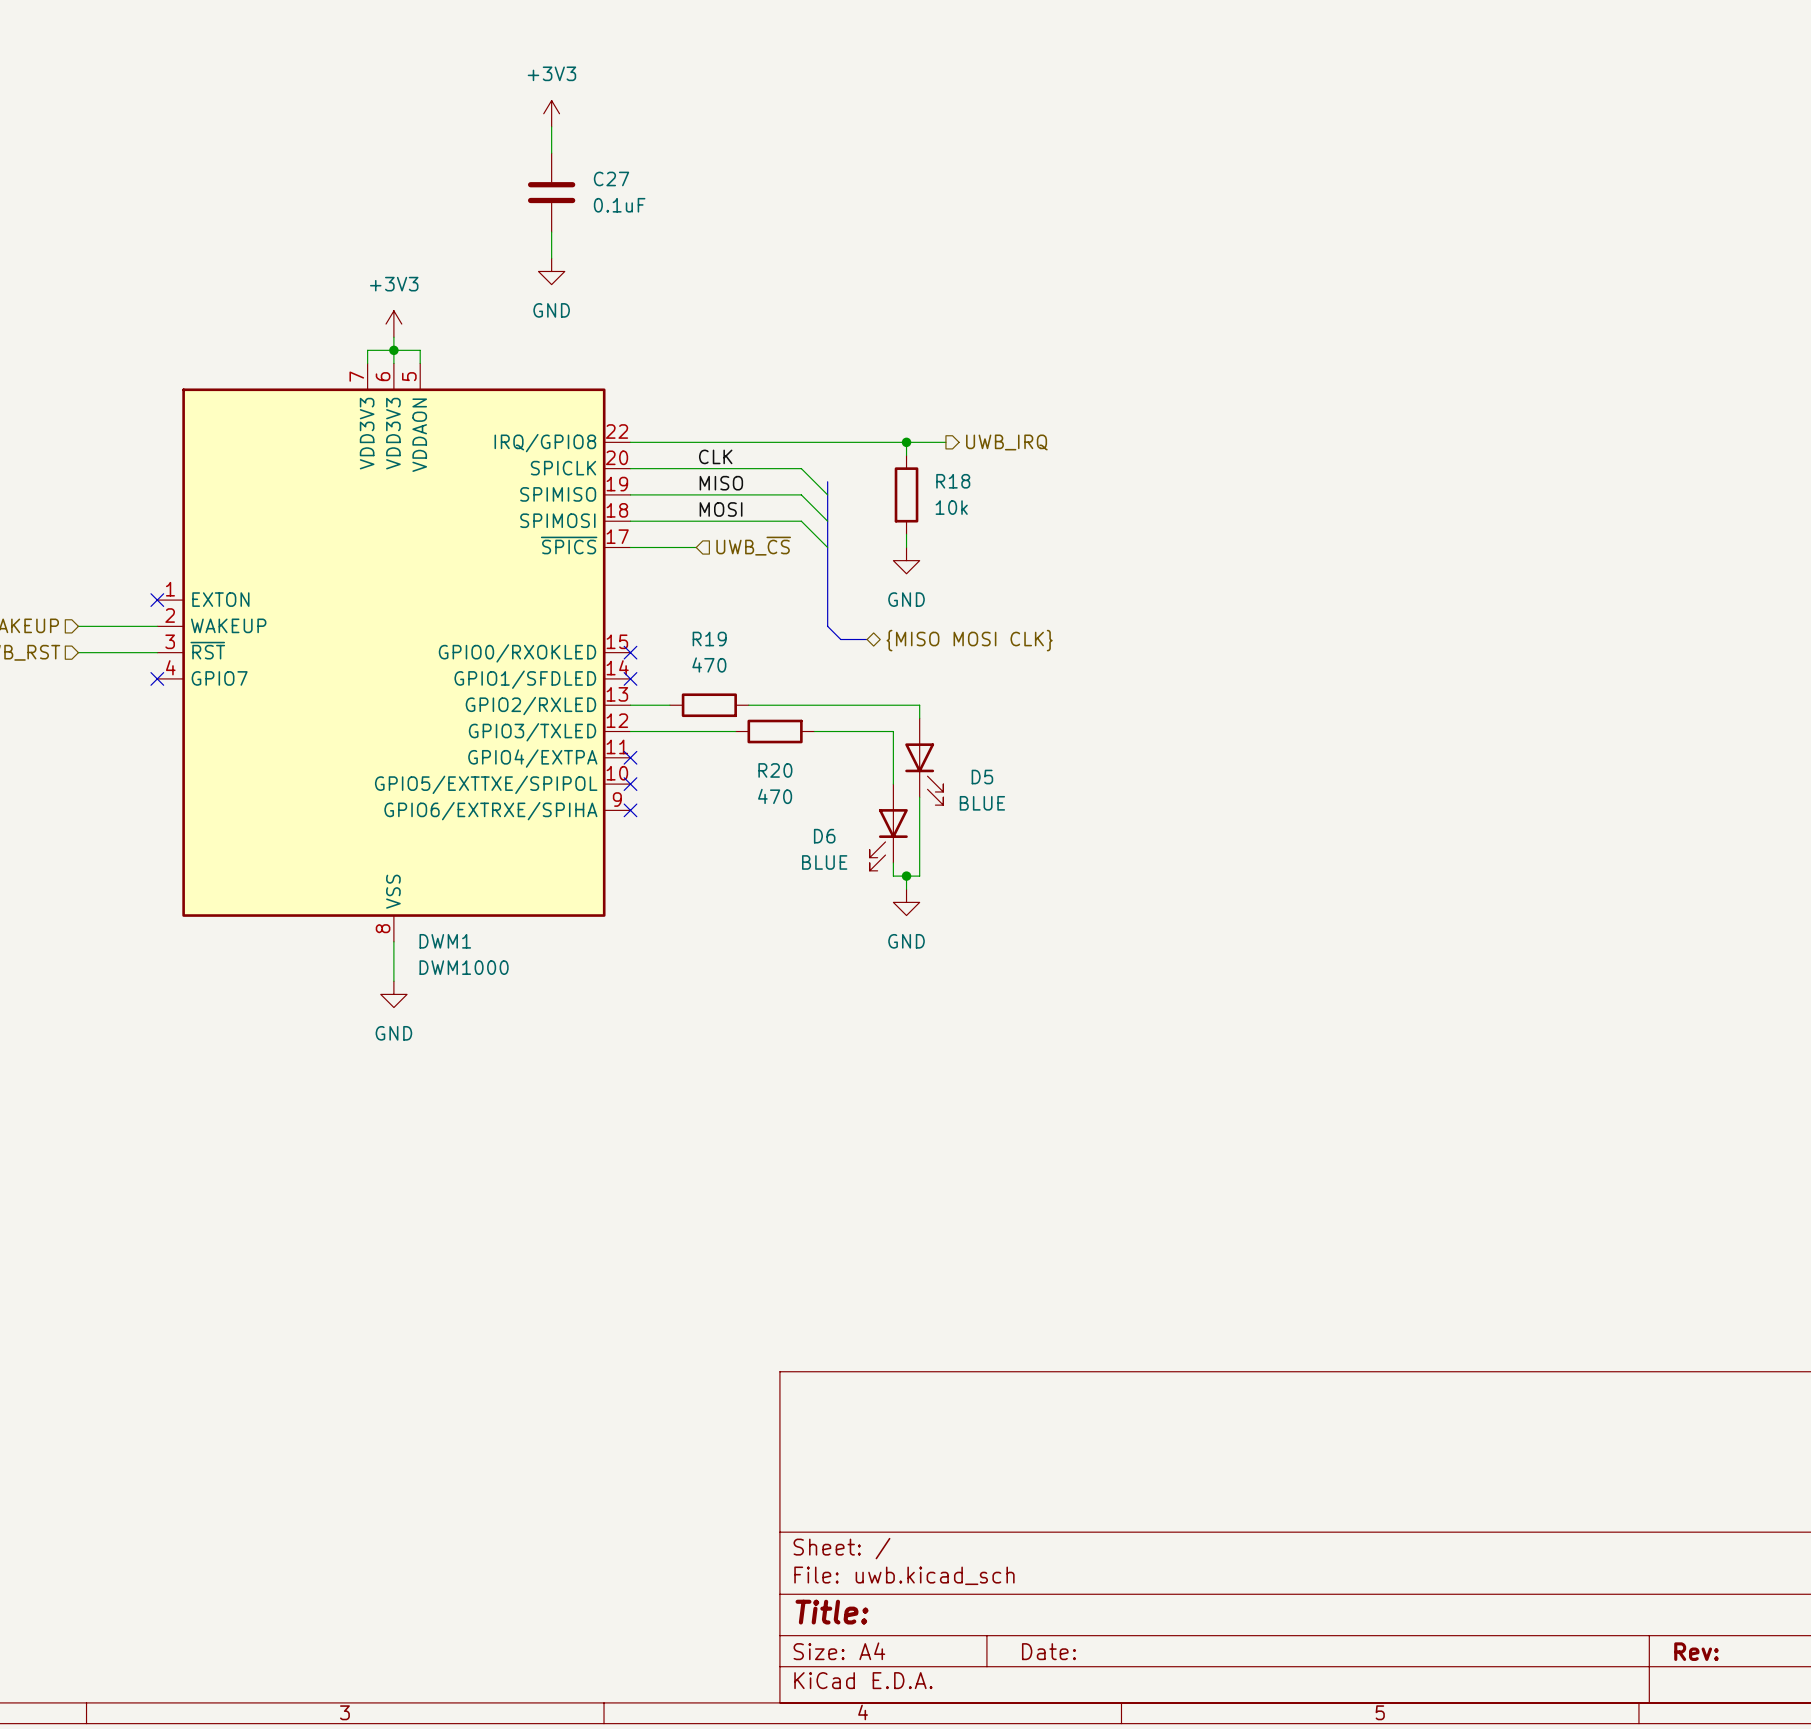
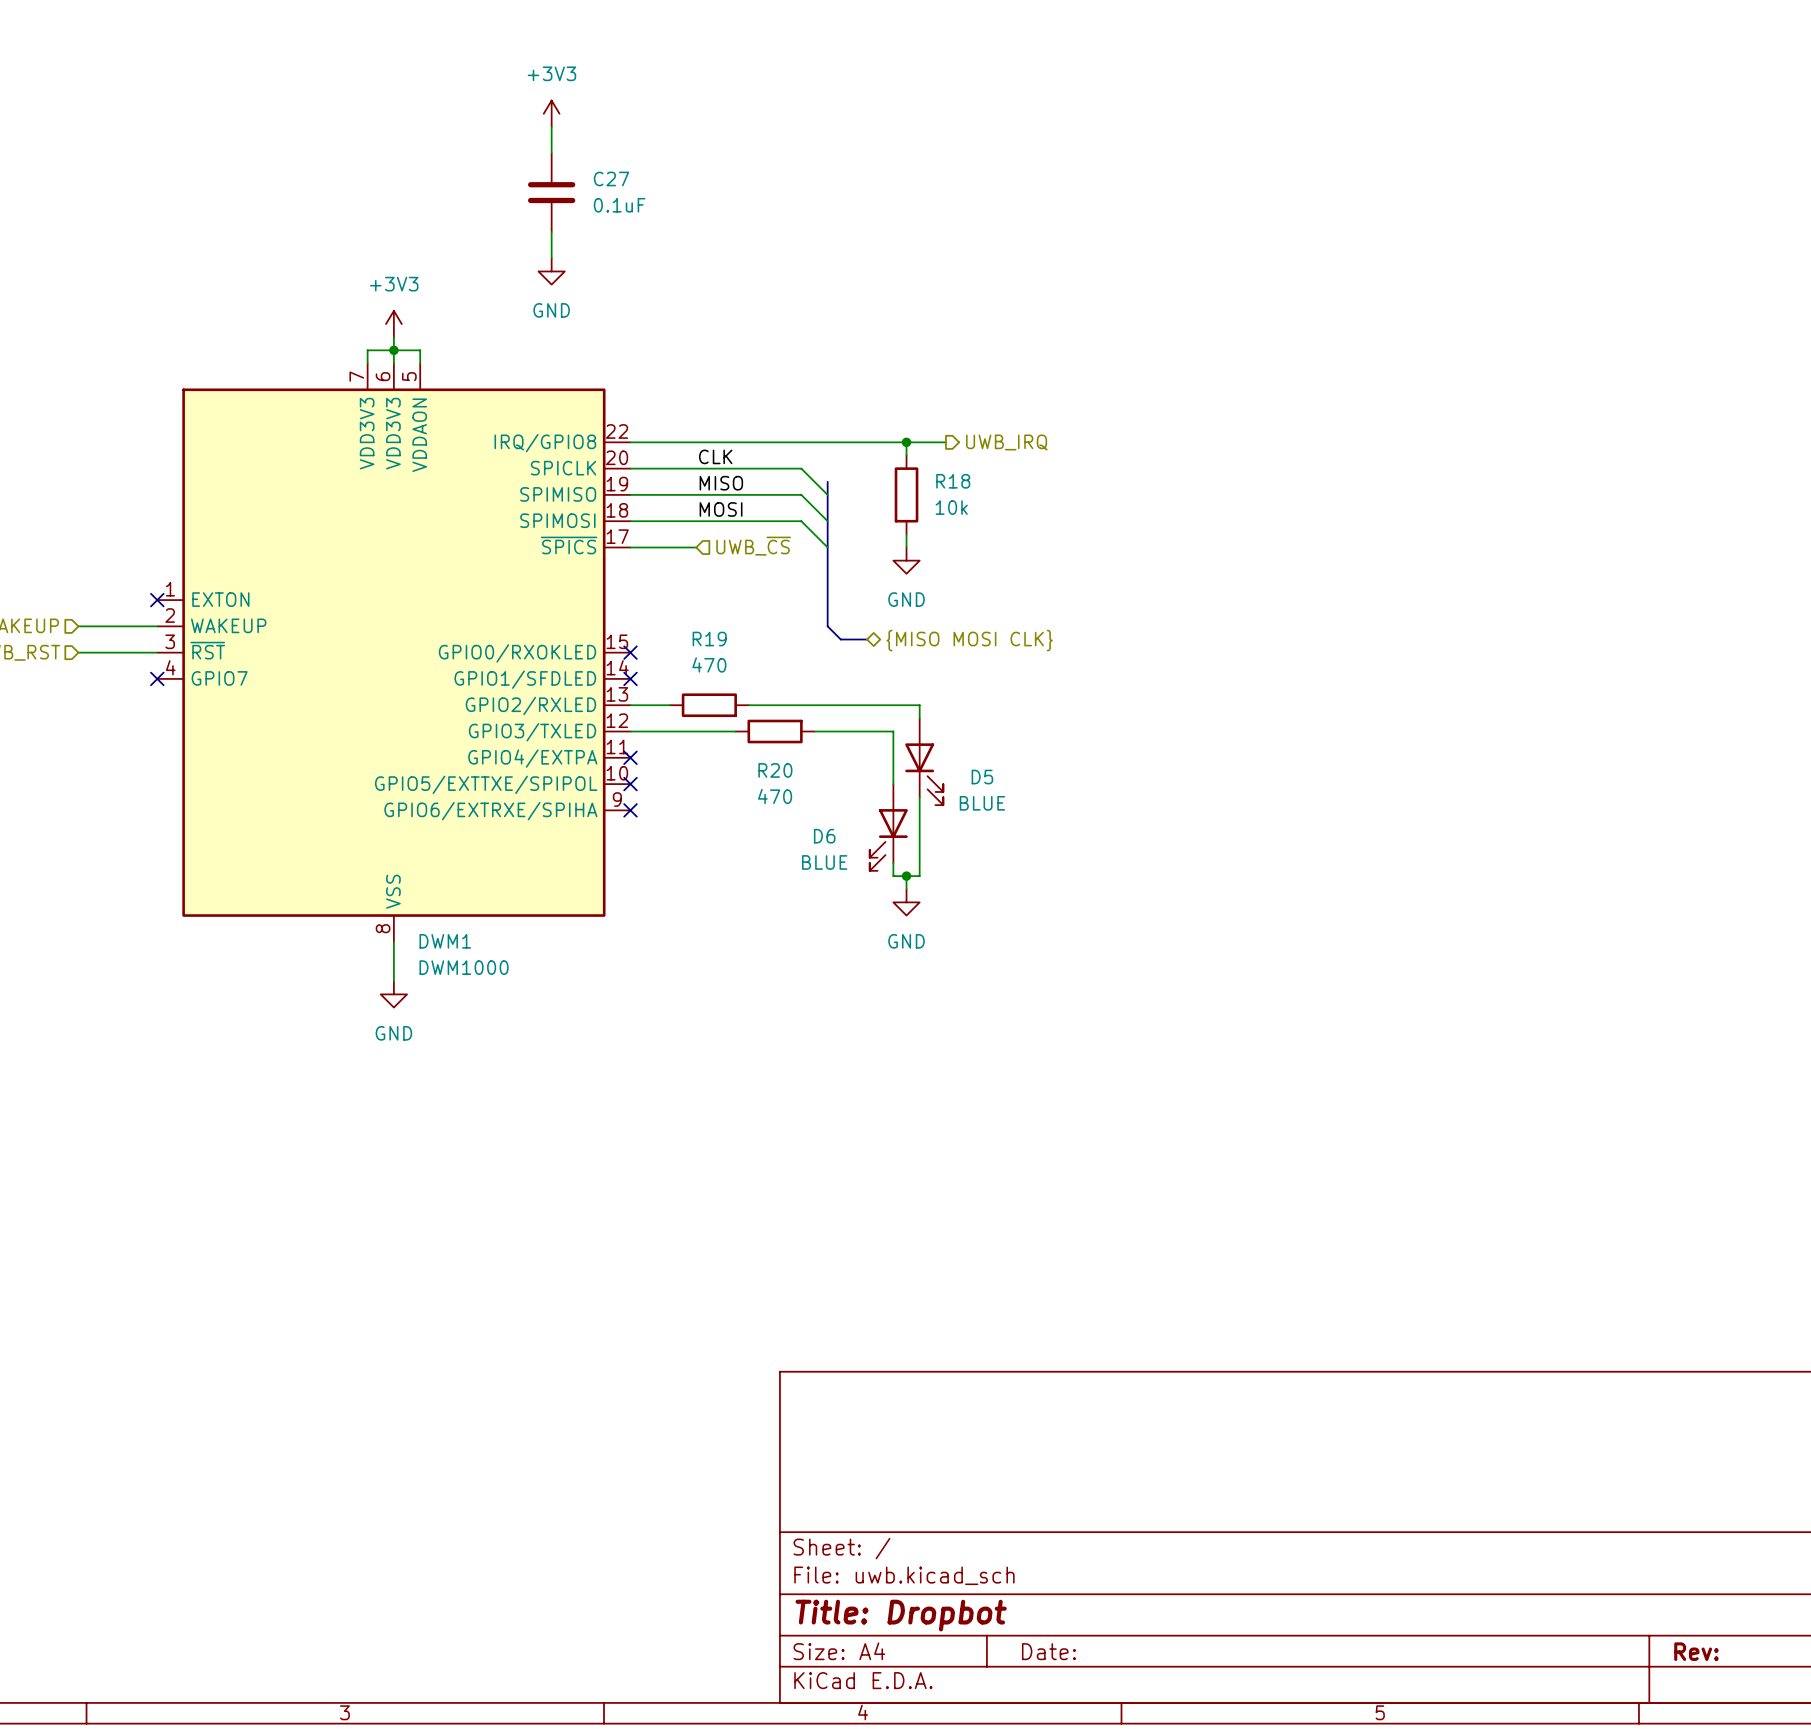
title block: Title: (832, 1612) -> Title: Dropbot (901, 1615)

